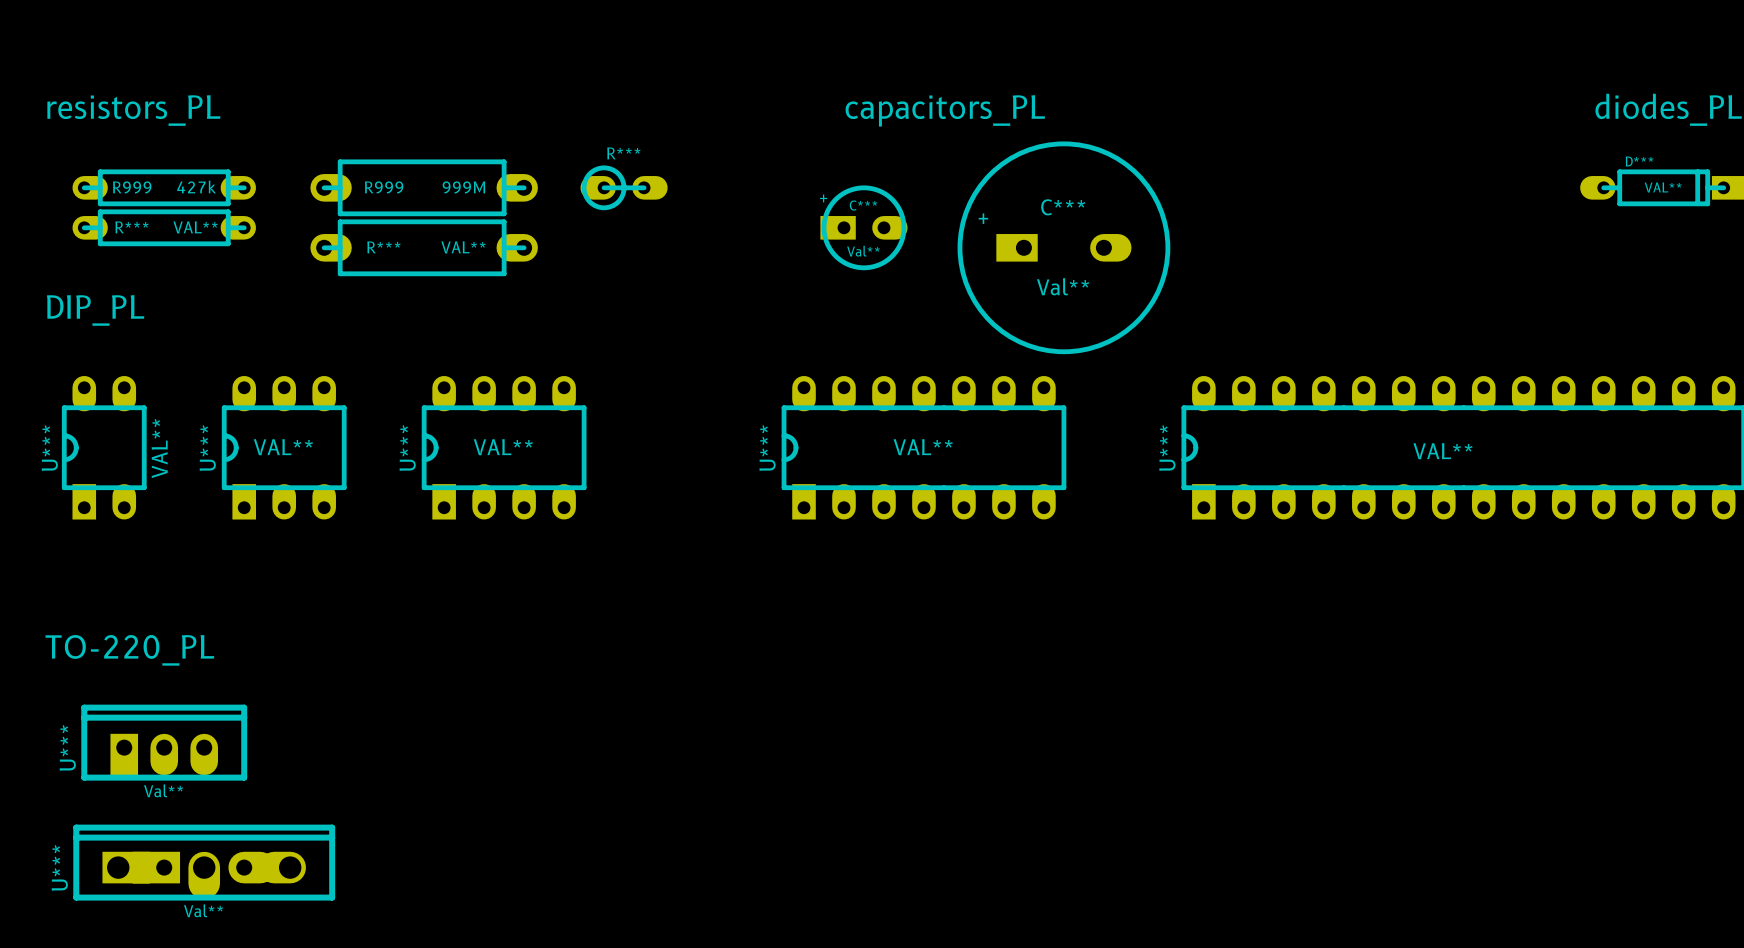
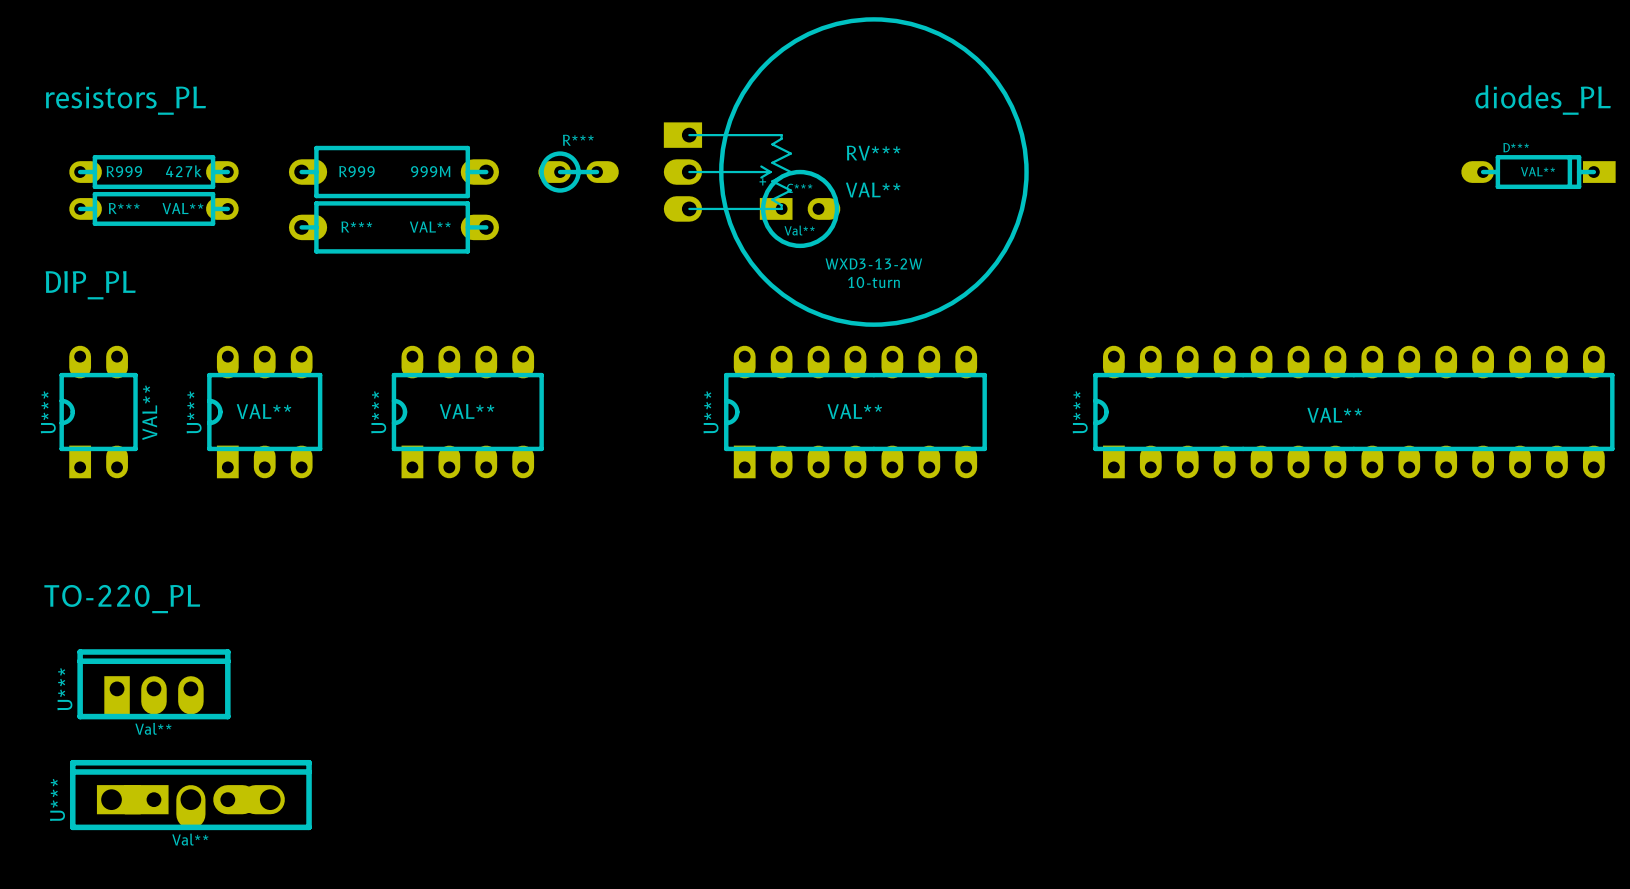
text: capacitors_PL (945, 110) -> none
RV***: none -> VAL** (846, 172)
C***: Val** (1063, 247) -> none

